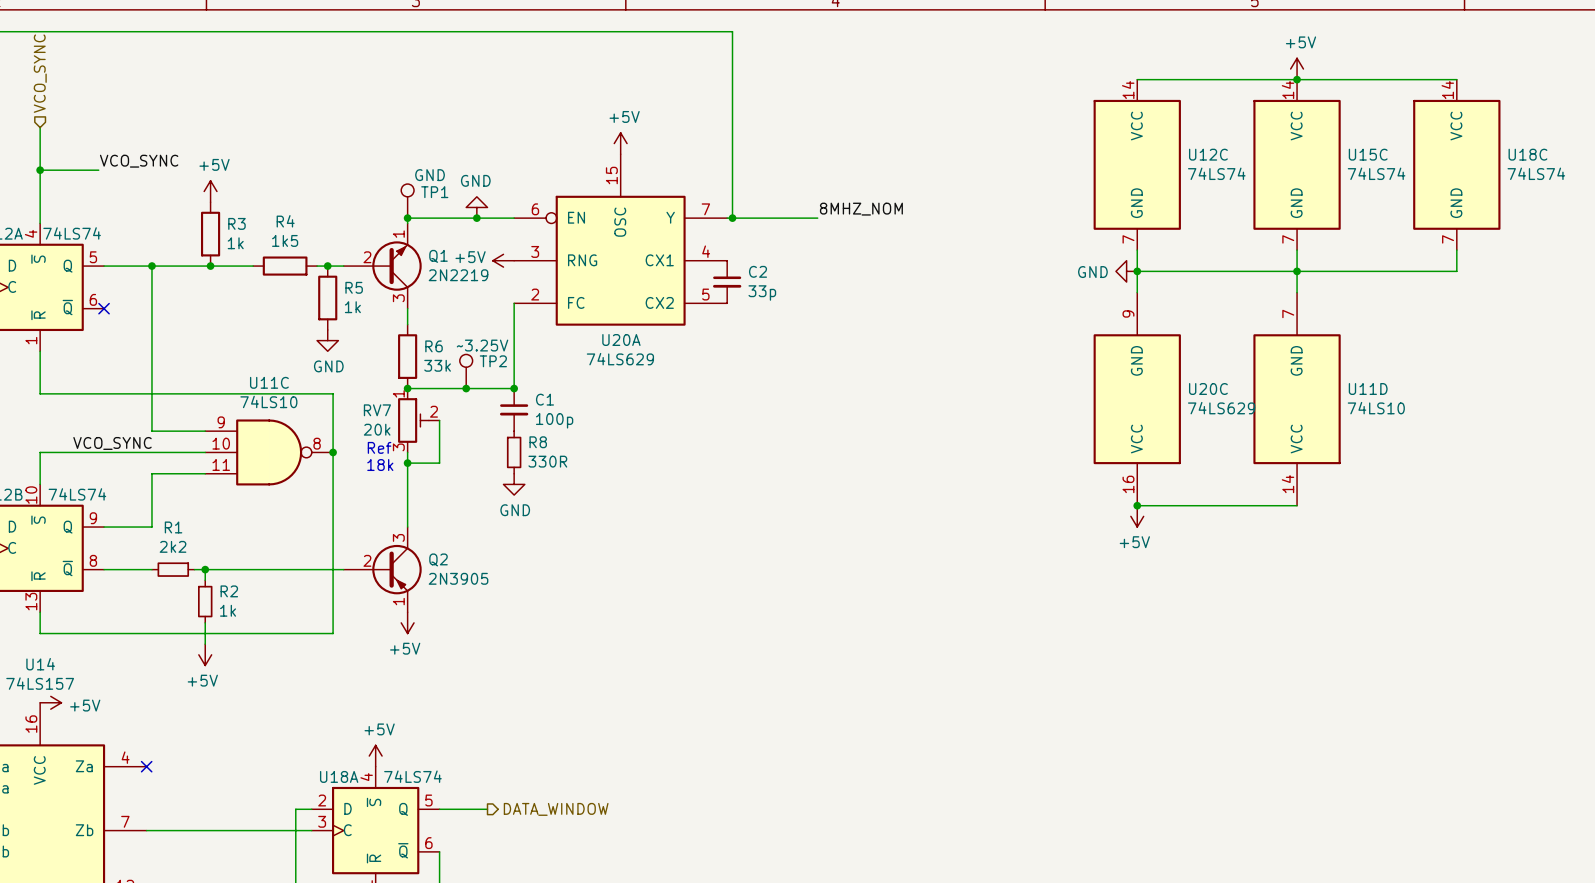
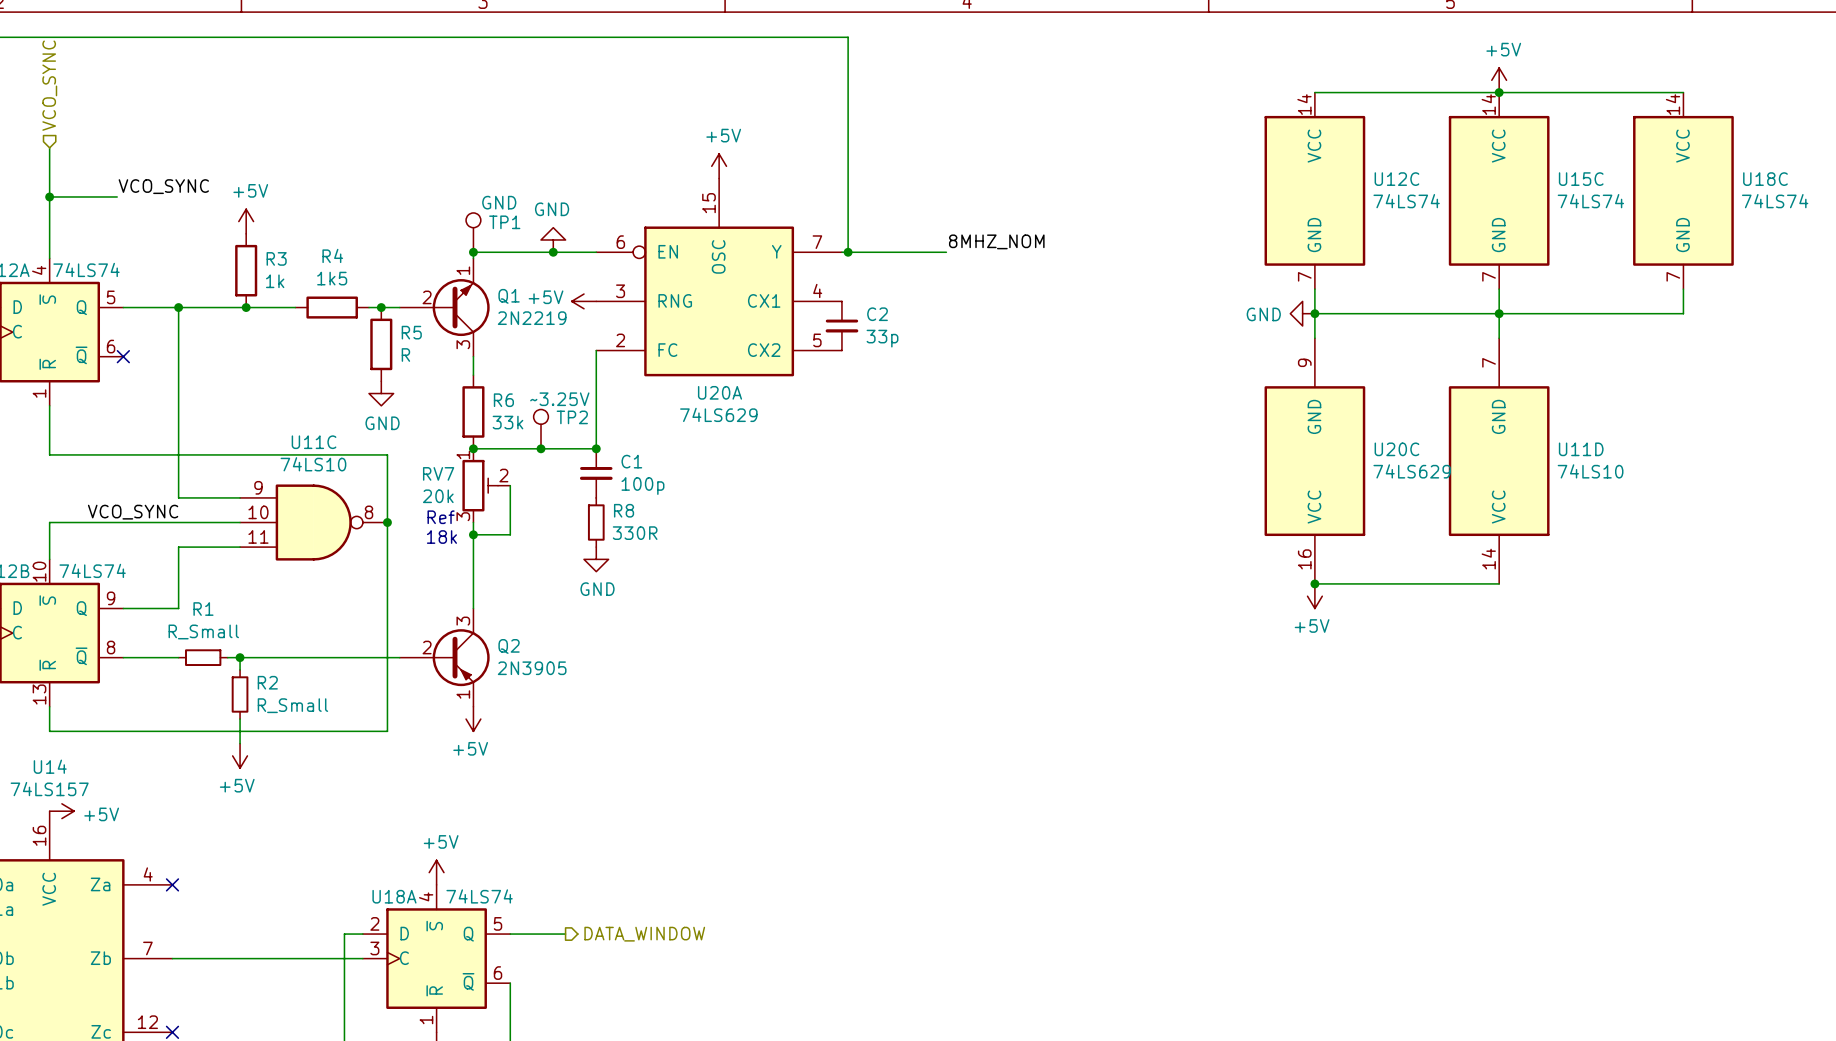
R5 value: 1k (352, 307) -> R (405, 354)
R1 value: 2k2 (173, 546) -> R_Small (203, 631)
R2 value: 1k (228, 610) -> R_Small (292, 705)

